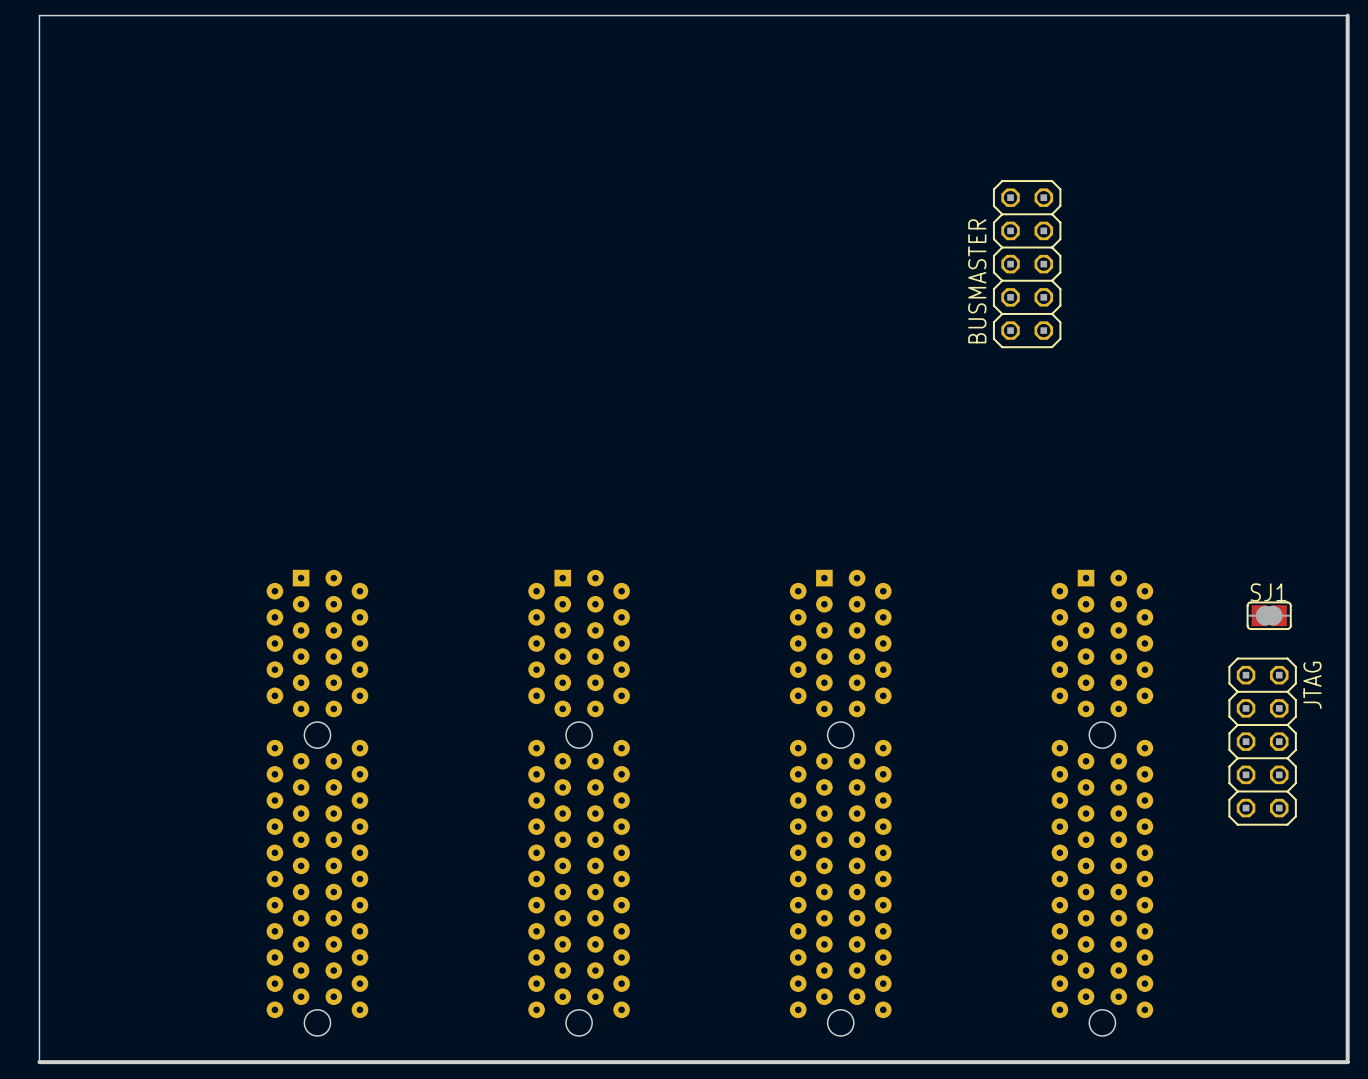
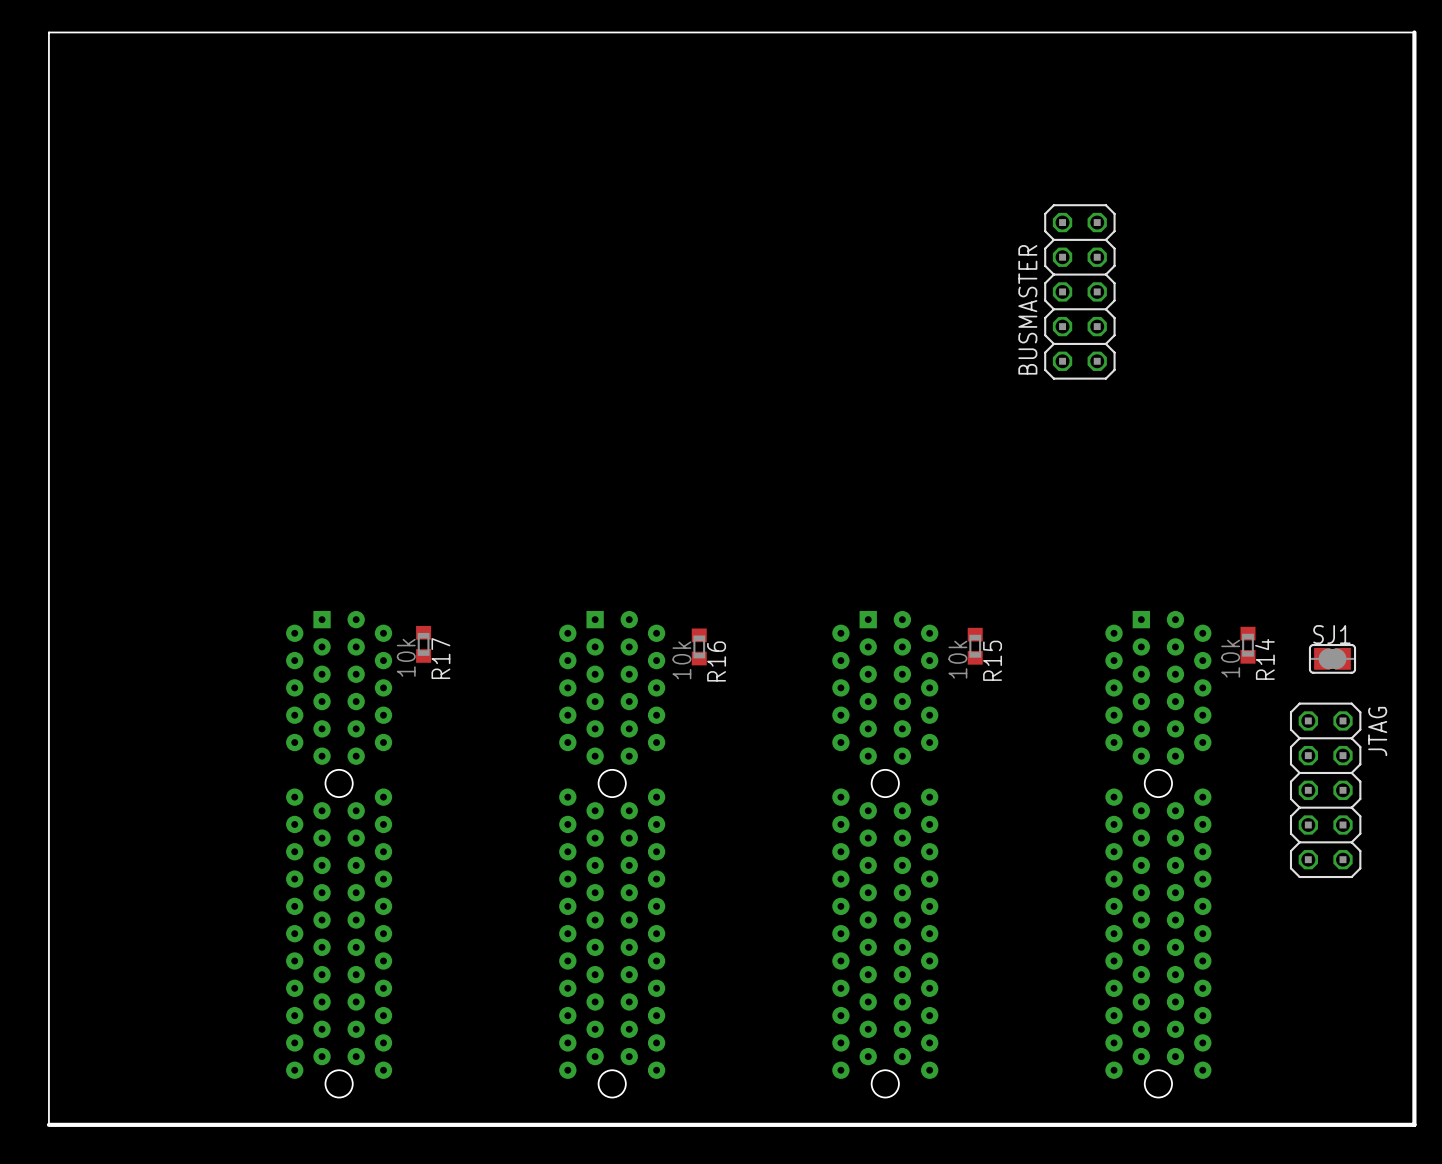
R17: none -> 10k (423, 644)
R14: none -> 10k (1248, 645)
R15: none -> 10k (975, 646)
R16: none -> 10k (699, 646)

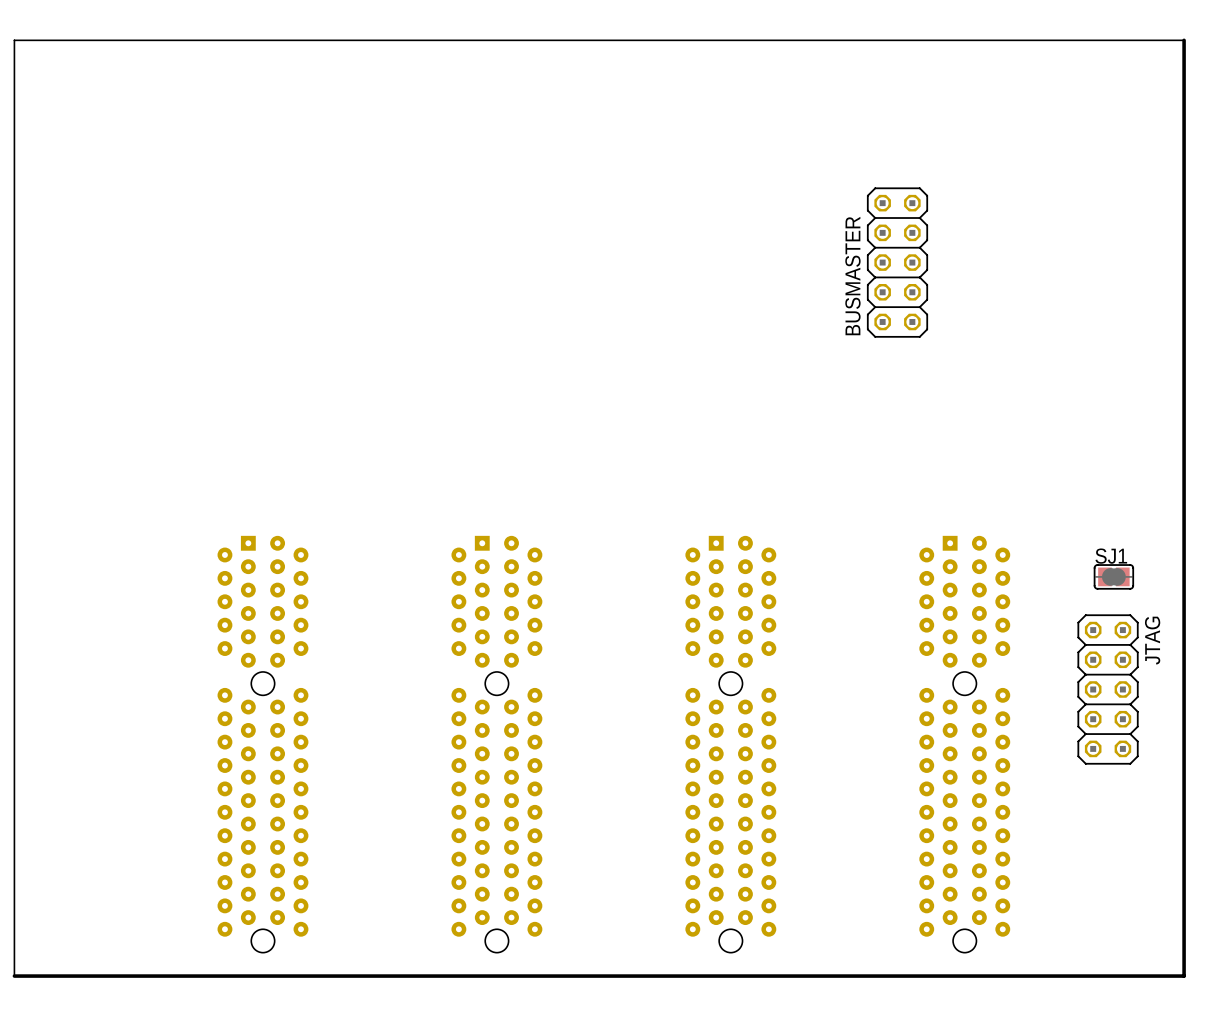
R17: 10k (423, 644) -> none
R14: 10k (1248, 645) -> none
R16: 10k (699, 646) -> none
R15: 10k (975, 646) -> none

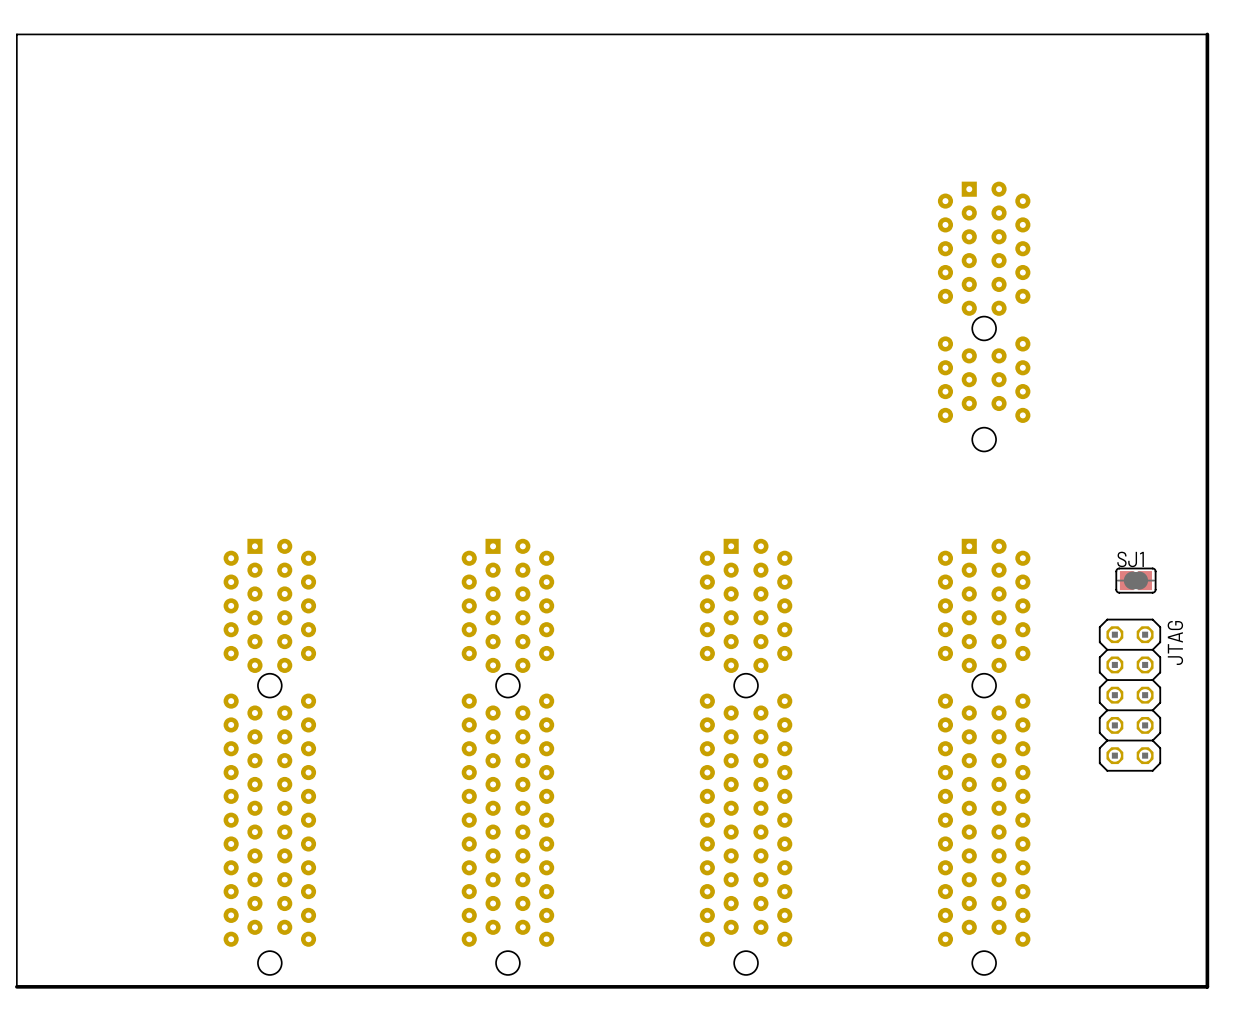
BUSMASTER: (897, 262) -> none
part: none -> (984, 316)
part footprint: [217, 535, 309, 953] -> [223, 538, 317, 975]
part footprint: [451, 535, 543, 953] -> [461, 538, 555, 975]
part footprint: [685, 535, 777, 953] -> [699, 538, 793, 975]
part footprint: [919, 535, 1011, 953] -> [937, 538, 1031, 975]

